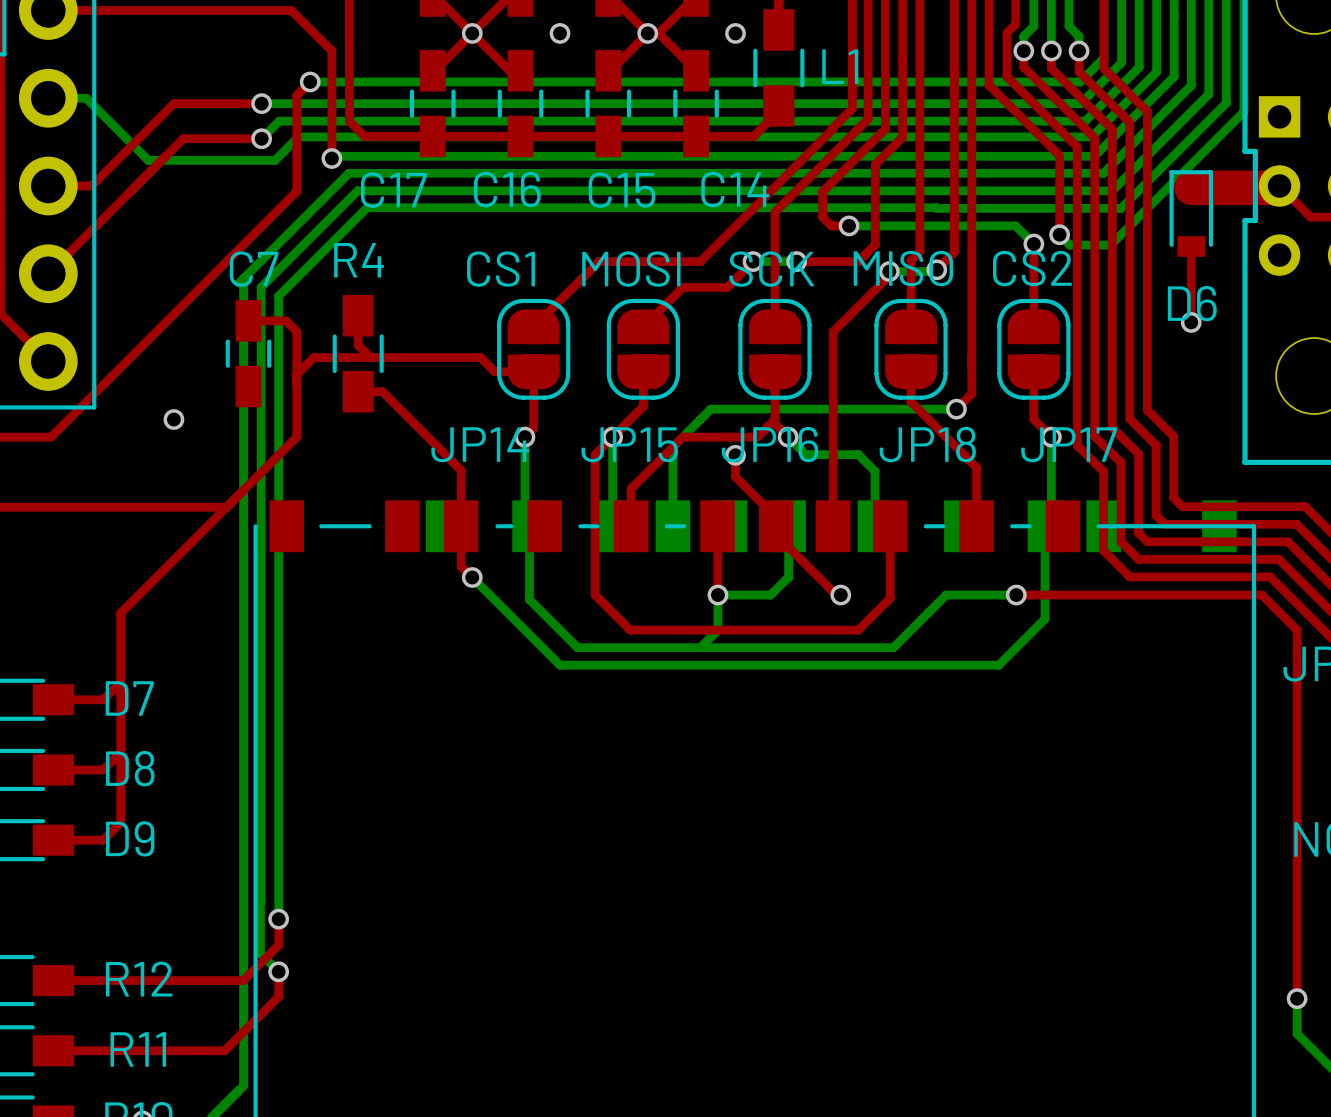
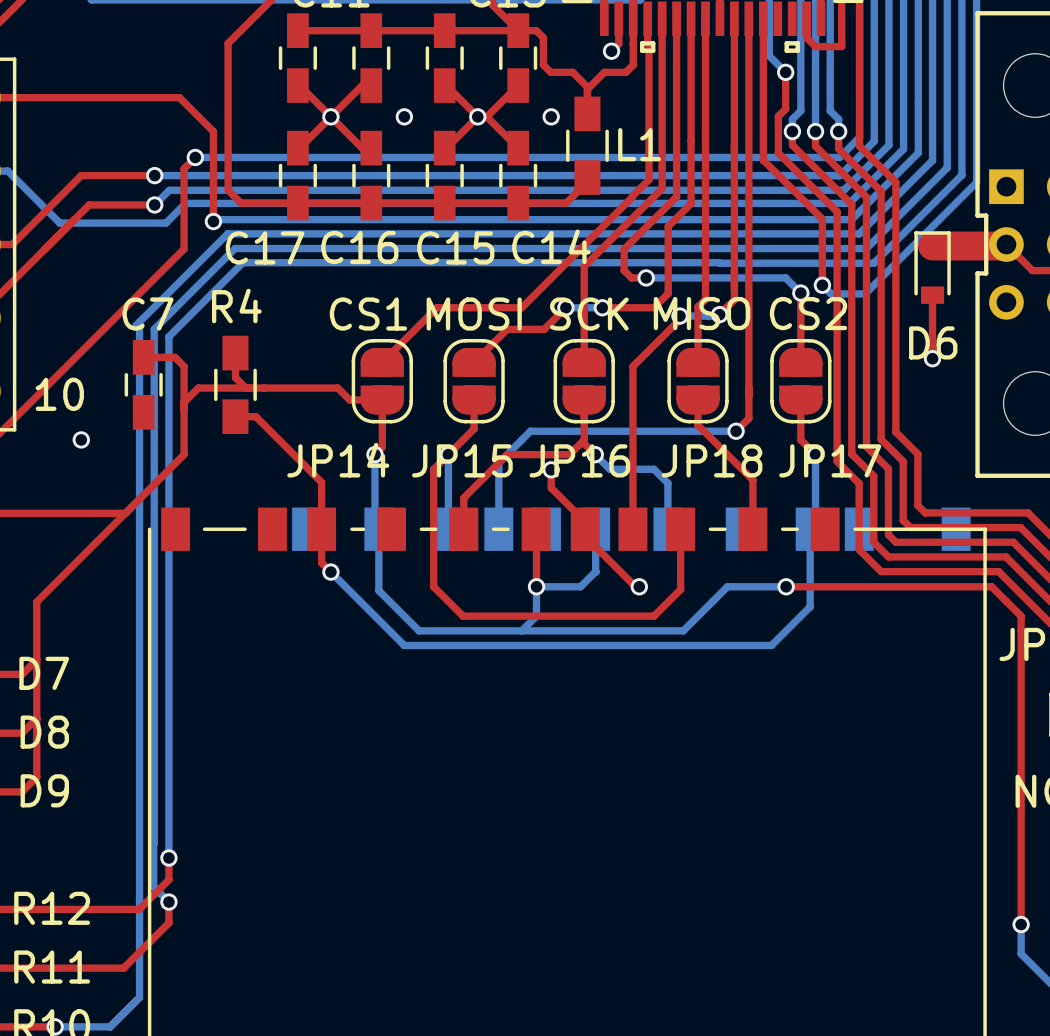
text: none -> 10 (59, 394)

